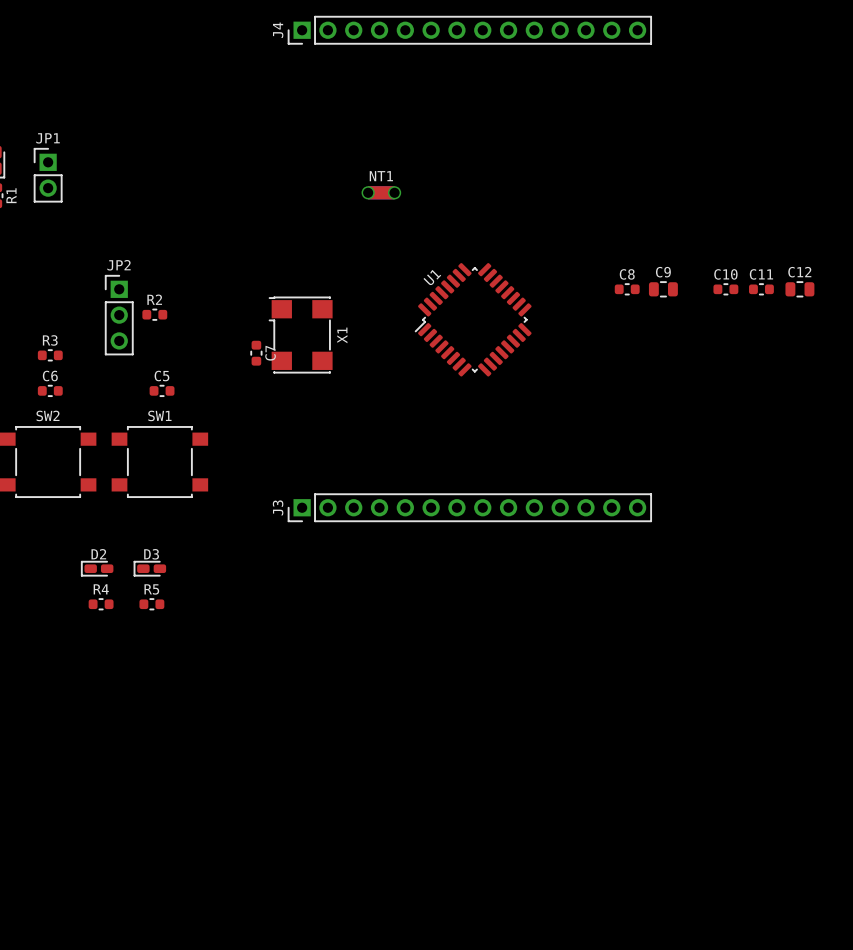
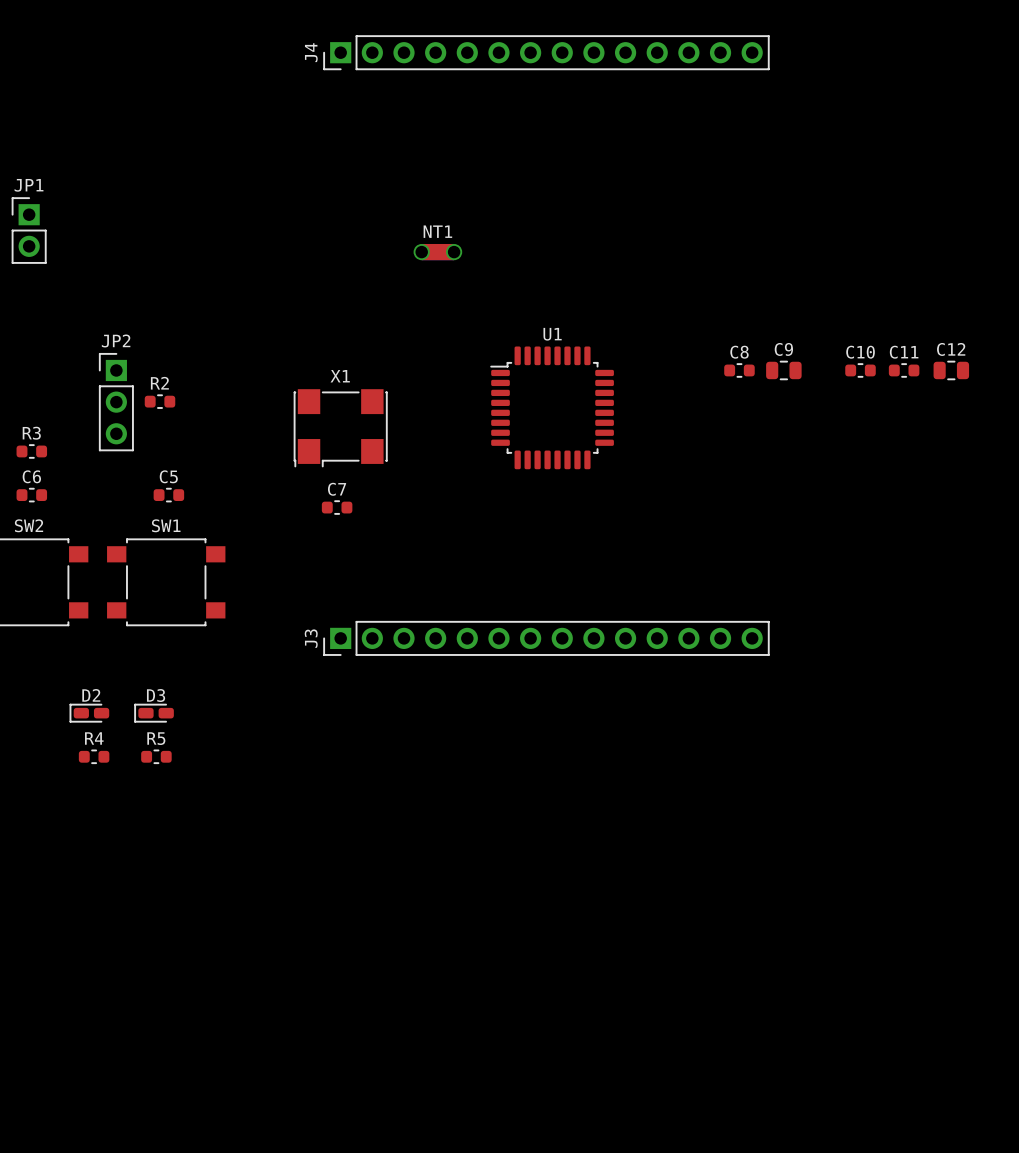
U1 rotation: 0° (473, 319) -> 45° clockwise (552, 407)
X1 rotation: 0° (300, 335) -> 90° counterclockwise (340, 428)
C7 rotation: 0° (256, 353) -> 90° clockwise (337, 507)
C7 position: (256, 353) -> (337, 507)
C7 name position: C7 (270, 353) -> C7 (337, 489)

